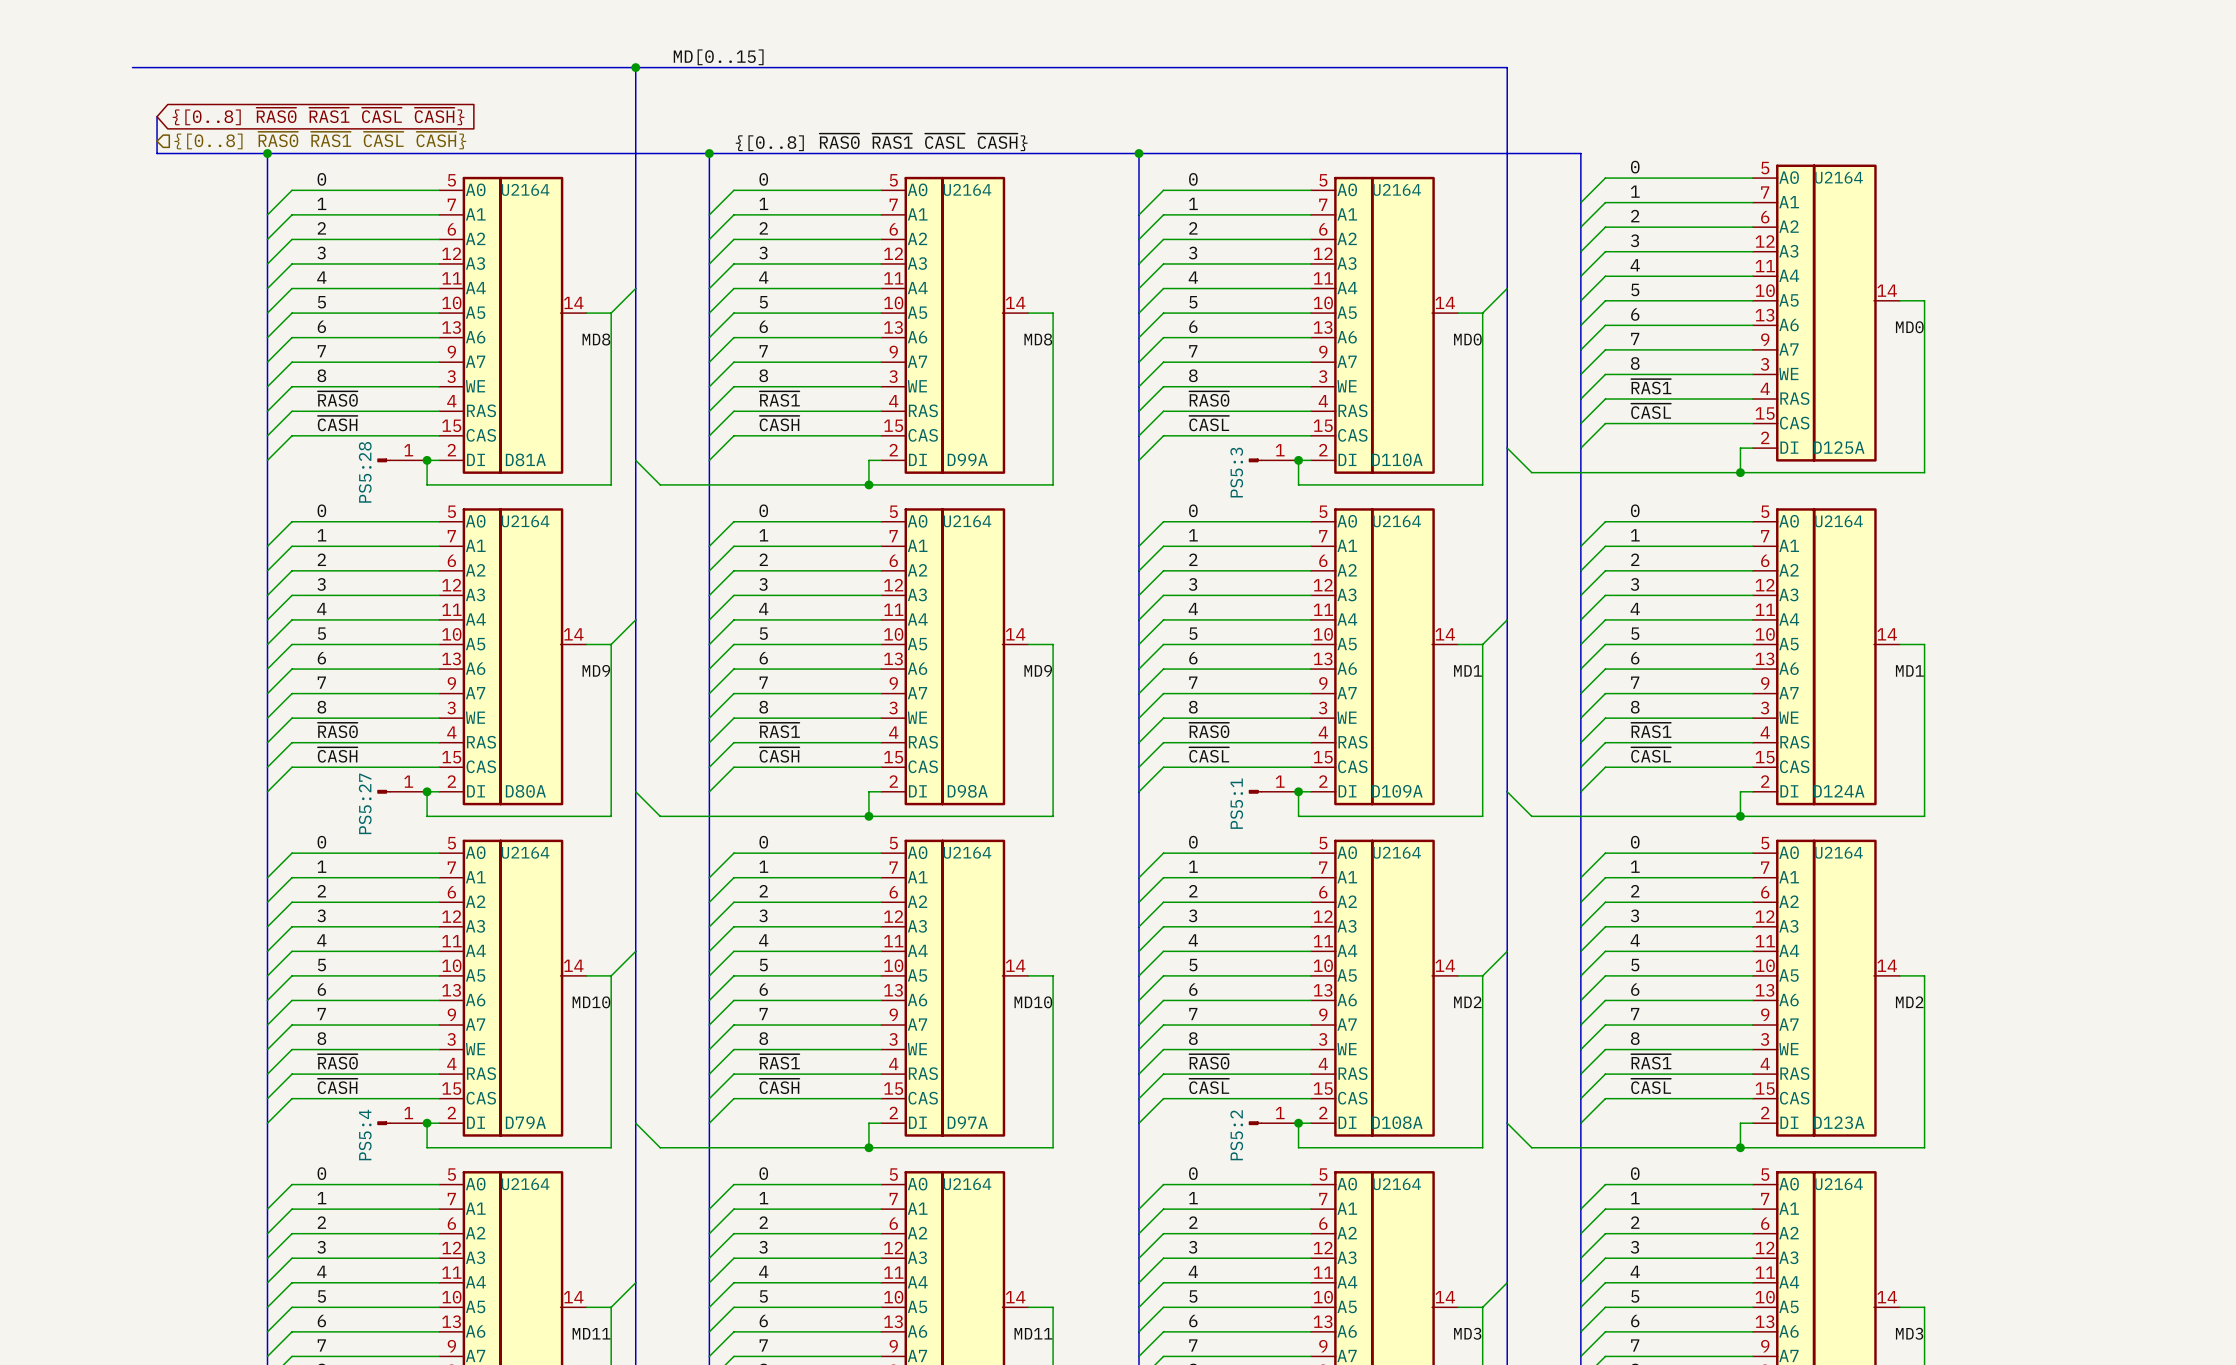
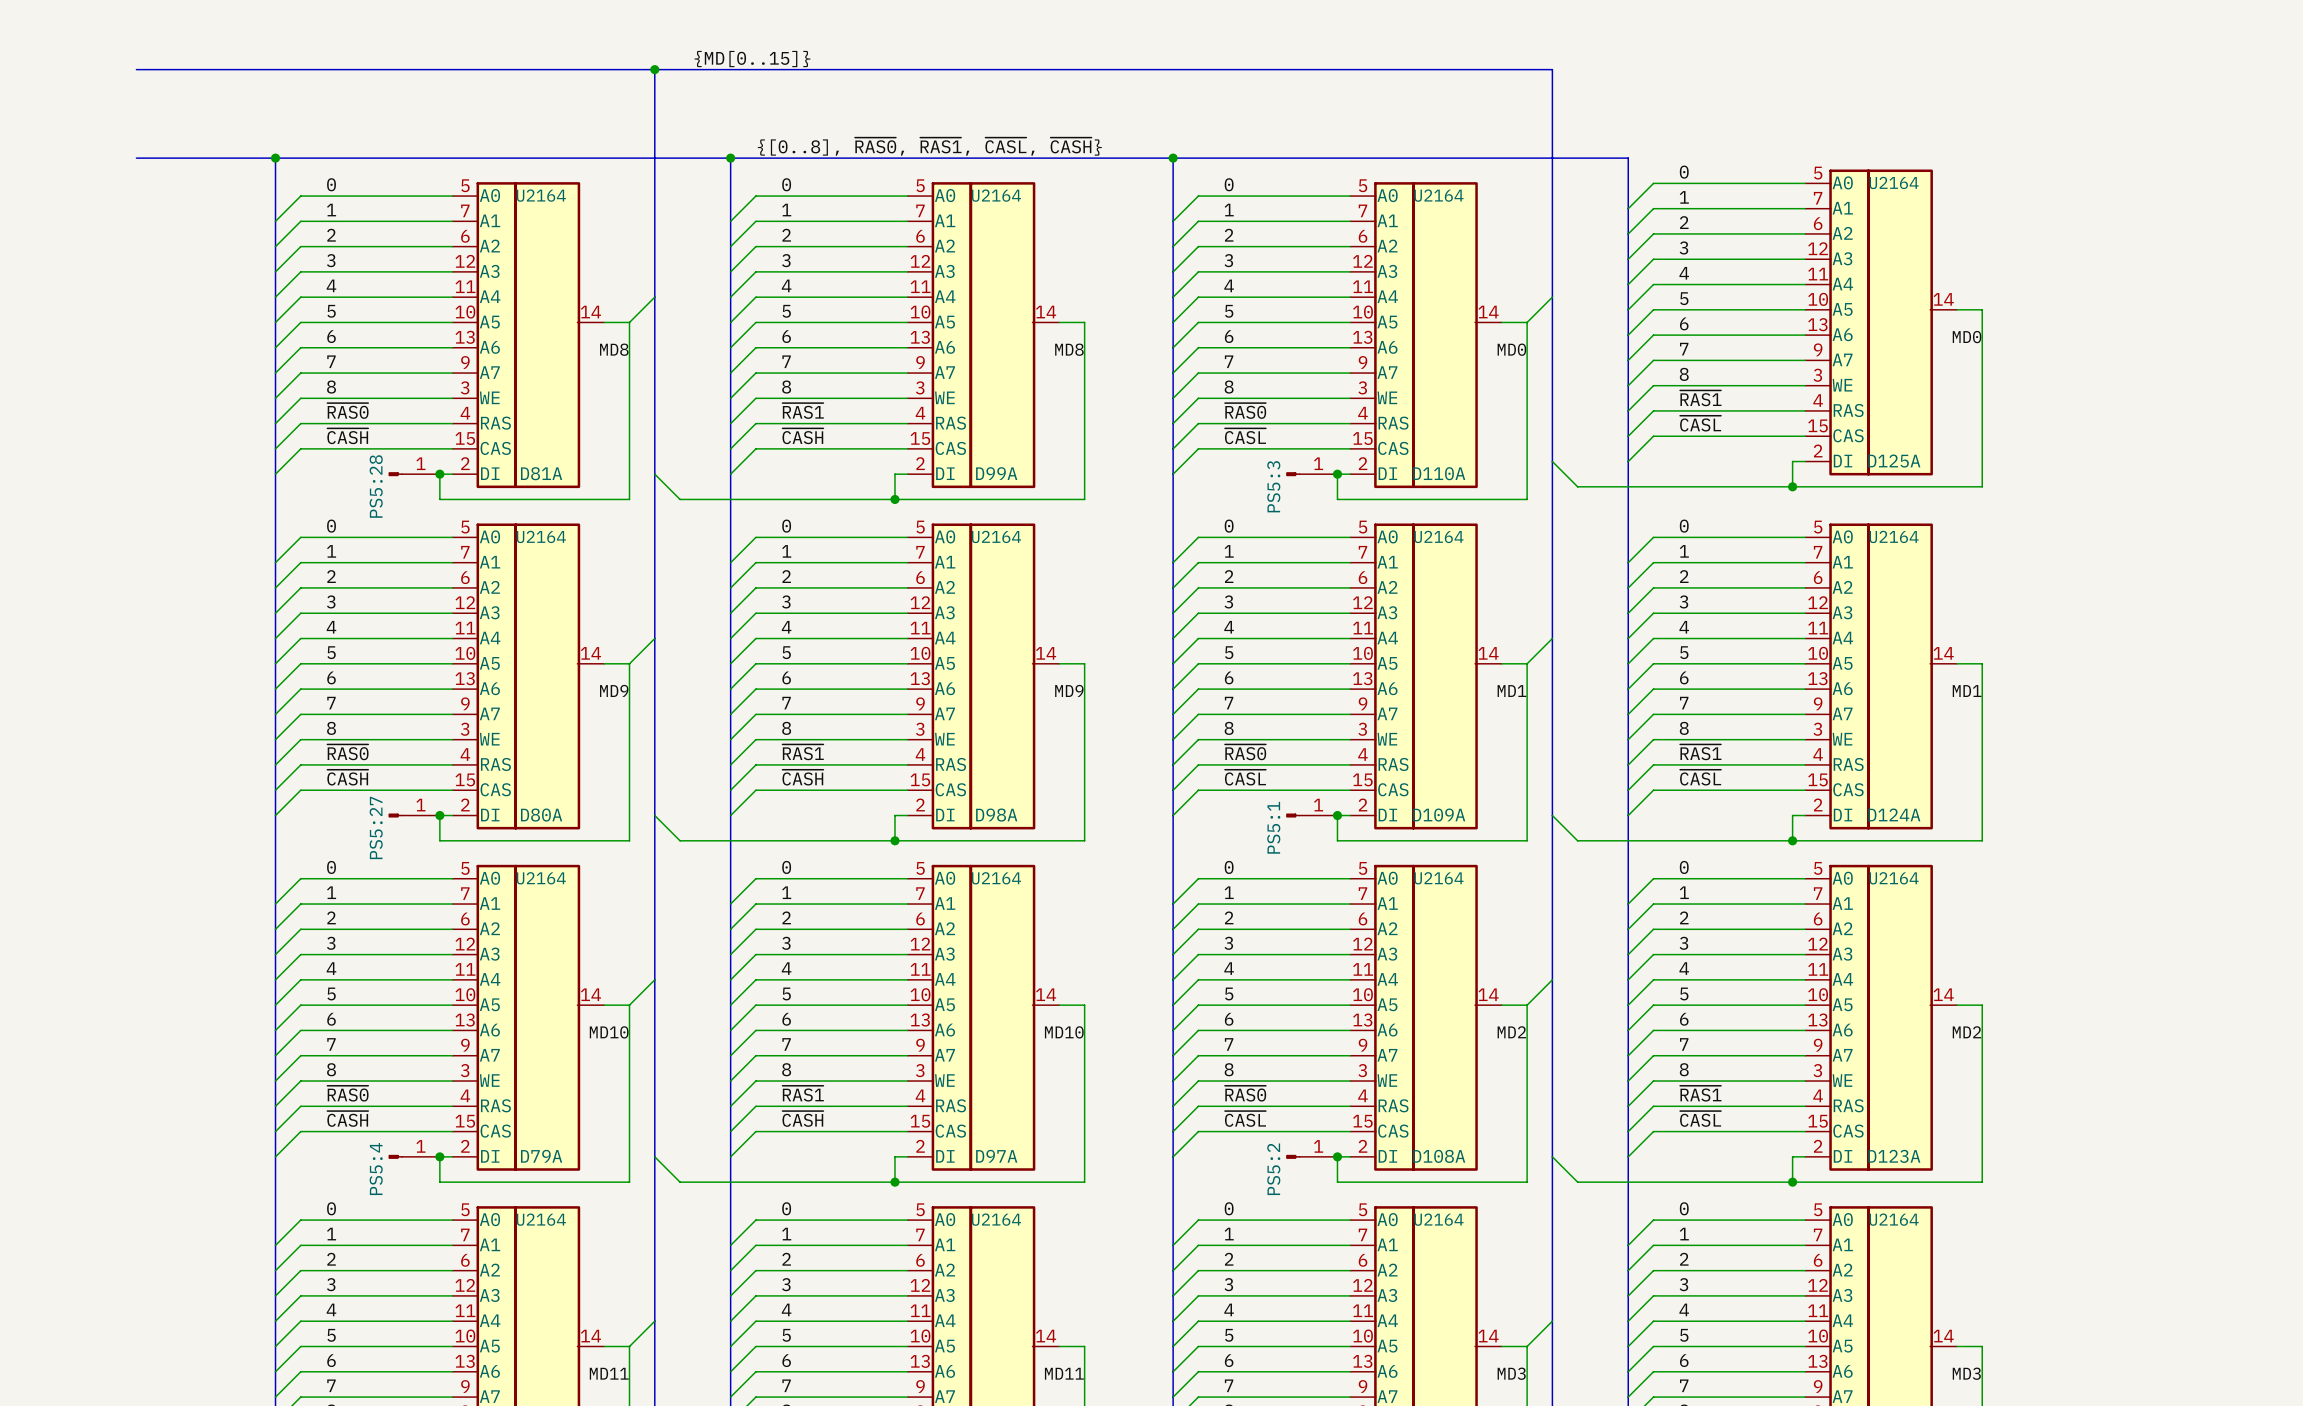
label: MD[0..15] (718, 57) -> {MD[0..15]} (752, 59)
bus: (157, 116) (157, 153) -> (136, 158) (161, 158)
global label: {[0..8] ~{RAS0} ~{RAS1} ~{CASL} ~{CASH}} (318, 116) -> none
hierarchical label: {[0..8] ~{RAS0} ~{RAS1} ~{CASL} ~{CASH}} (320, 140) -> none
label: {[0..8] ~{RAS0} ~{RAS1} ~{CASL} ~{CASH}} (881, 142) -> {[0..8], ~{RAS0}, ~{RAS1}, ~{CASL}, ~{CASH}} (929, 146)

